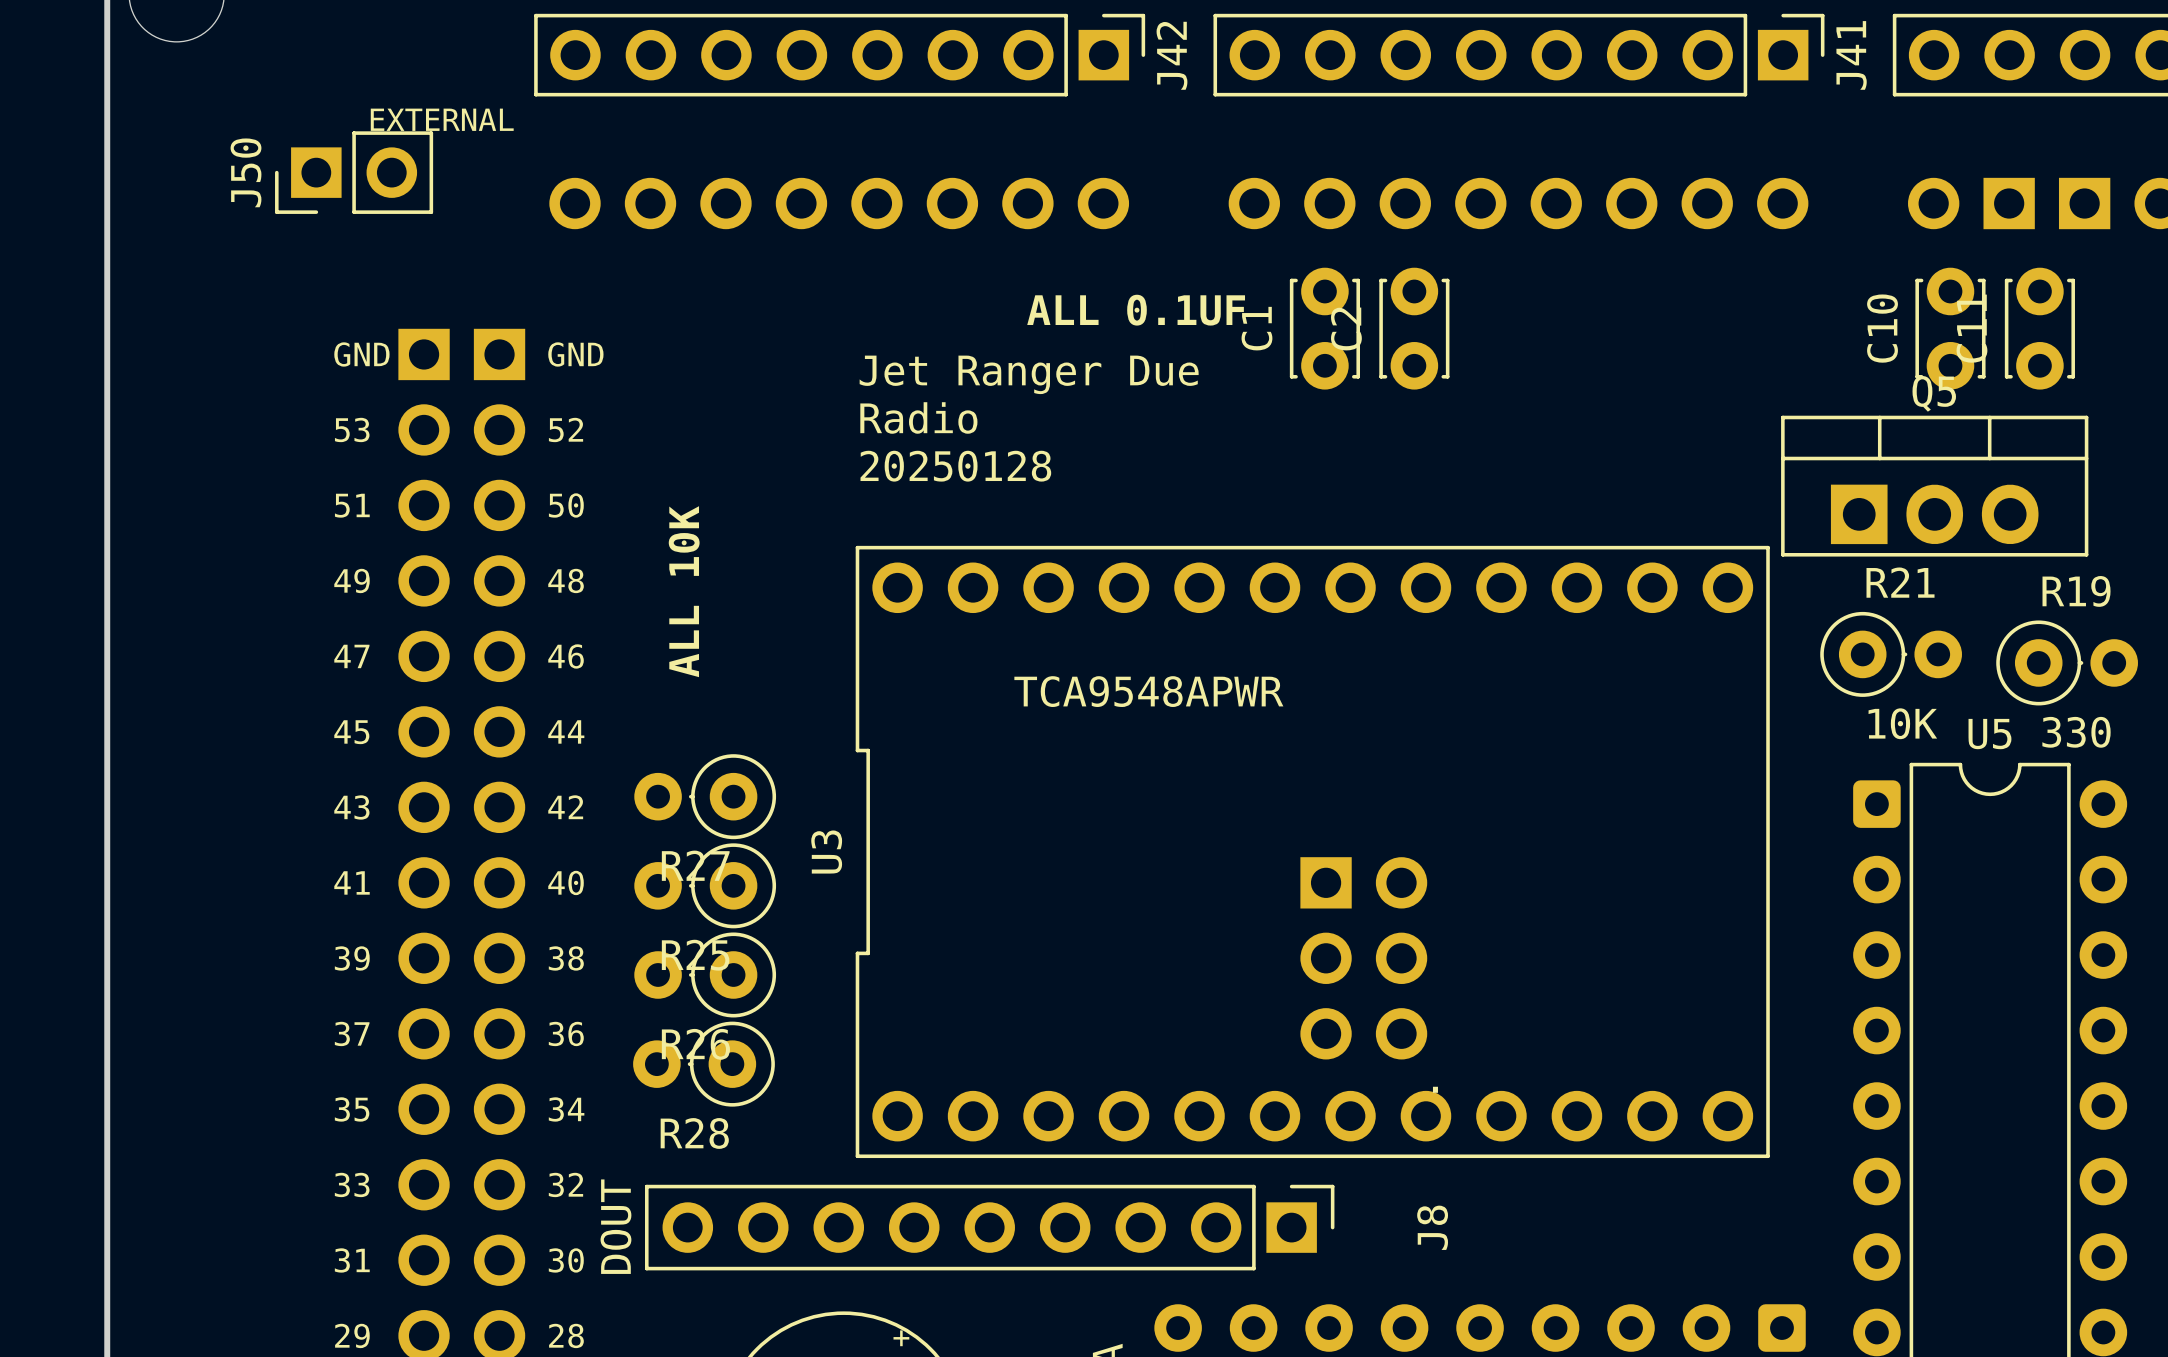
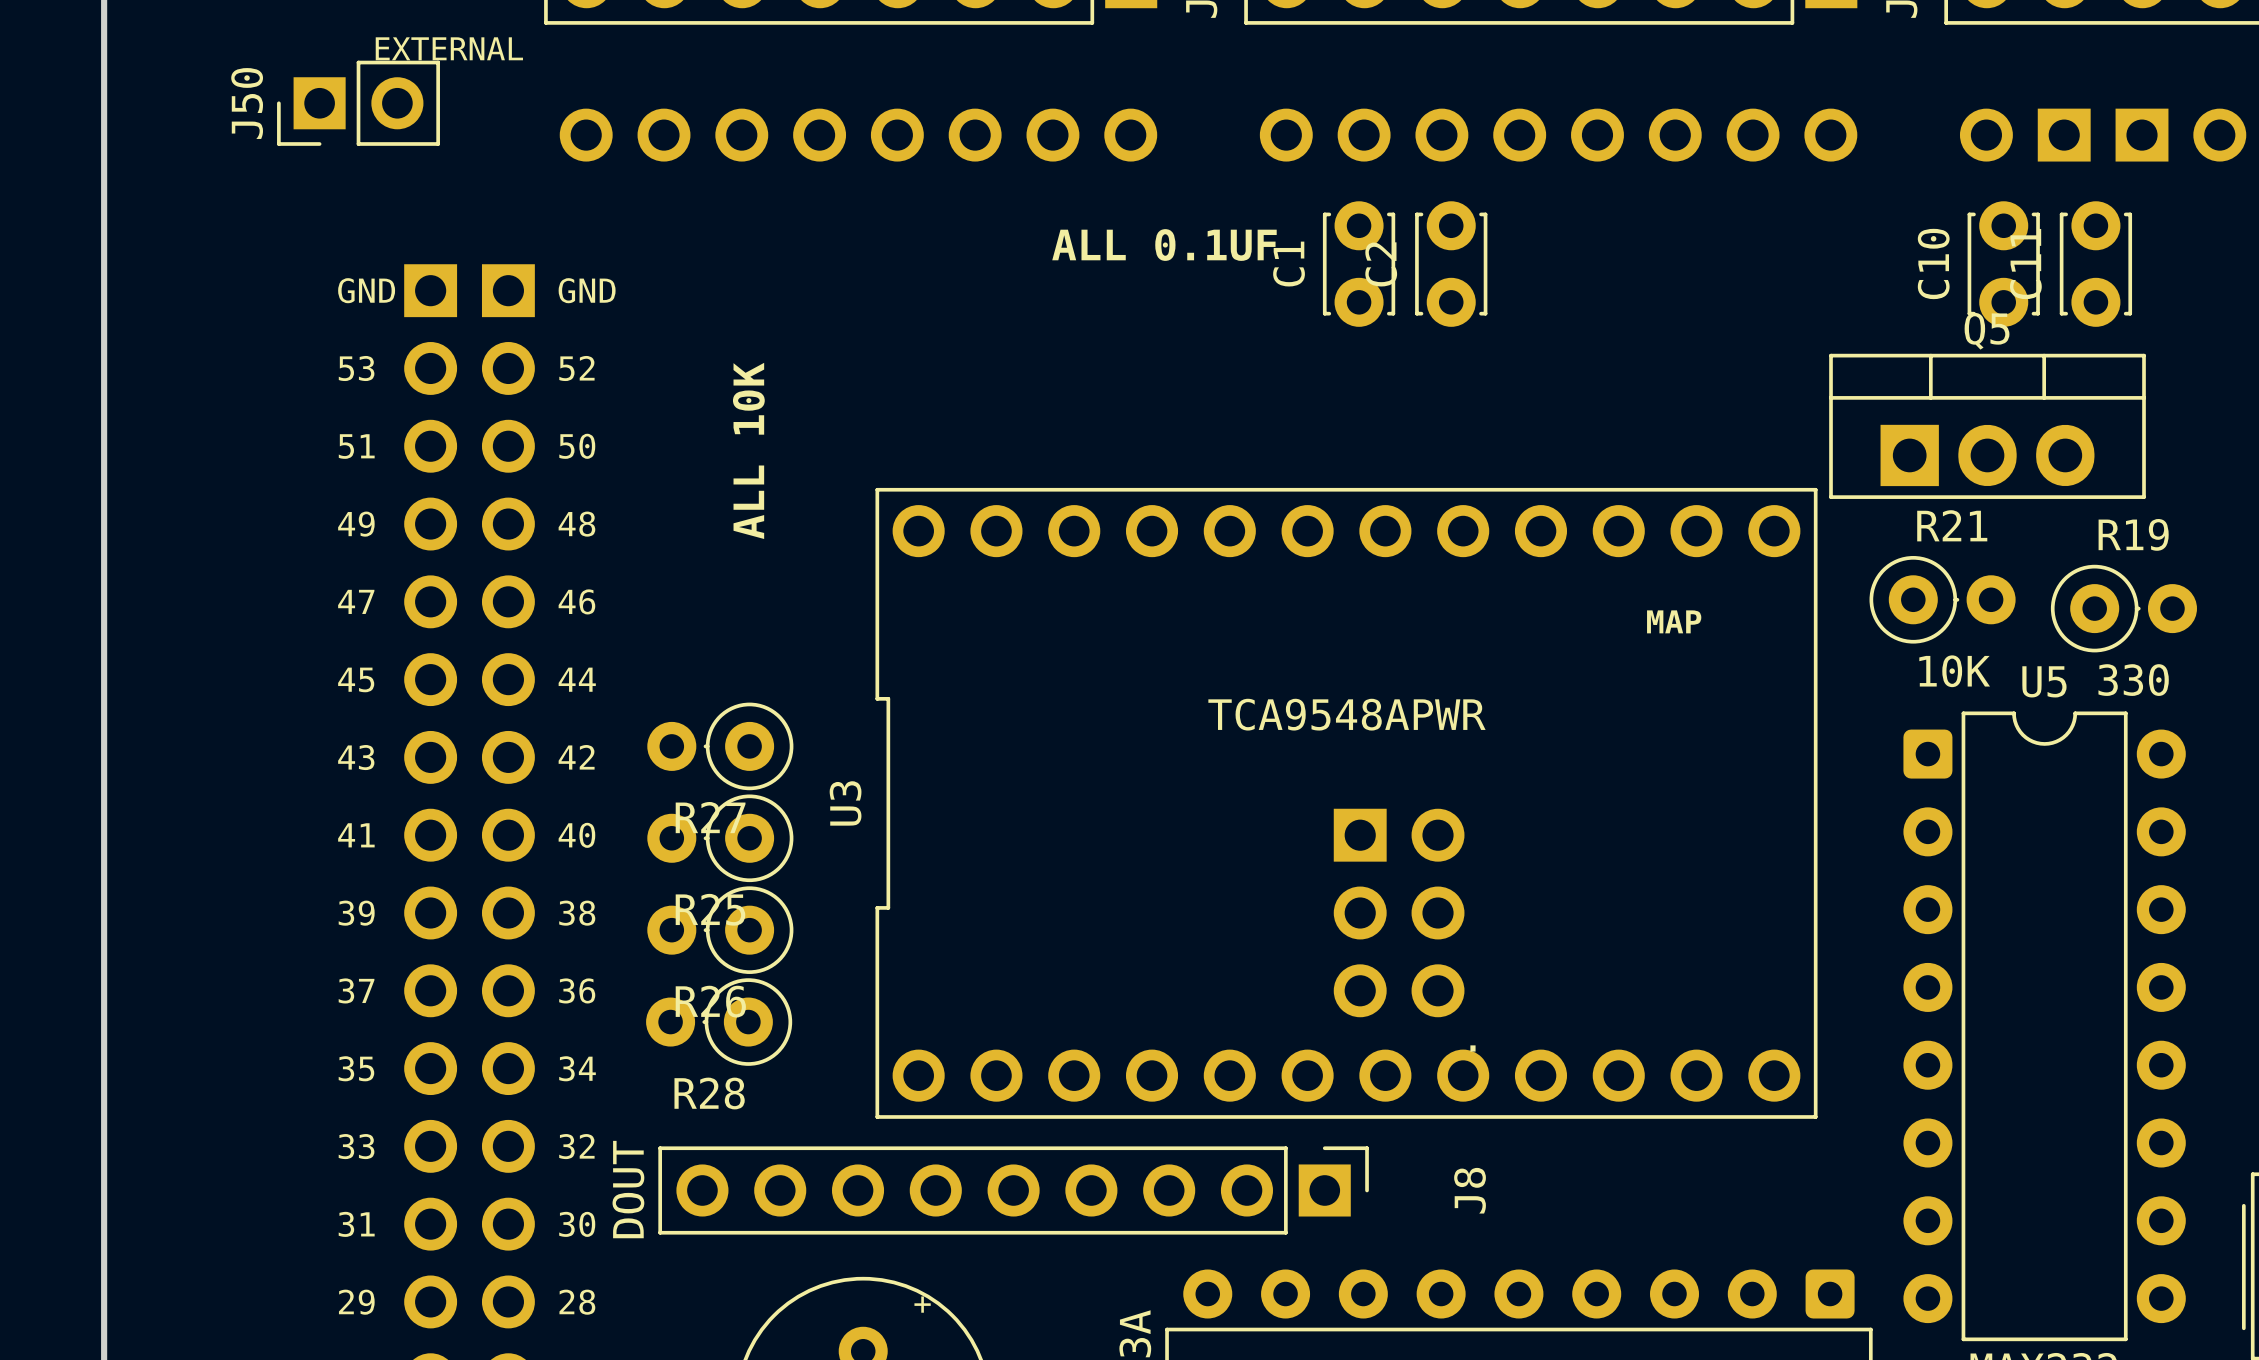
text: Jet Ranger Due (1029, 374) -> none
text: Radio (918, 417) -> none
text: 20250128 (955, 466) -> none
text position: ALL 10K (684, 591) -> ALL 10K (748, 450)
text: none -> MAP (1674, 621)
U3 value position: TCA9548APWR (1148, 691) -> TCA9548APWR (1346, 714)

